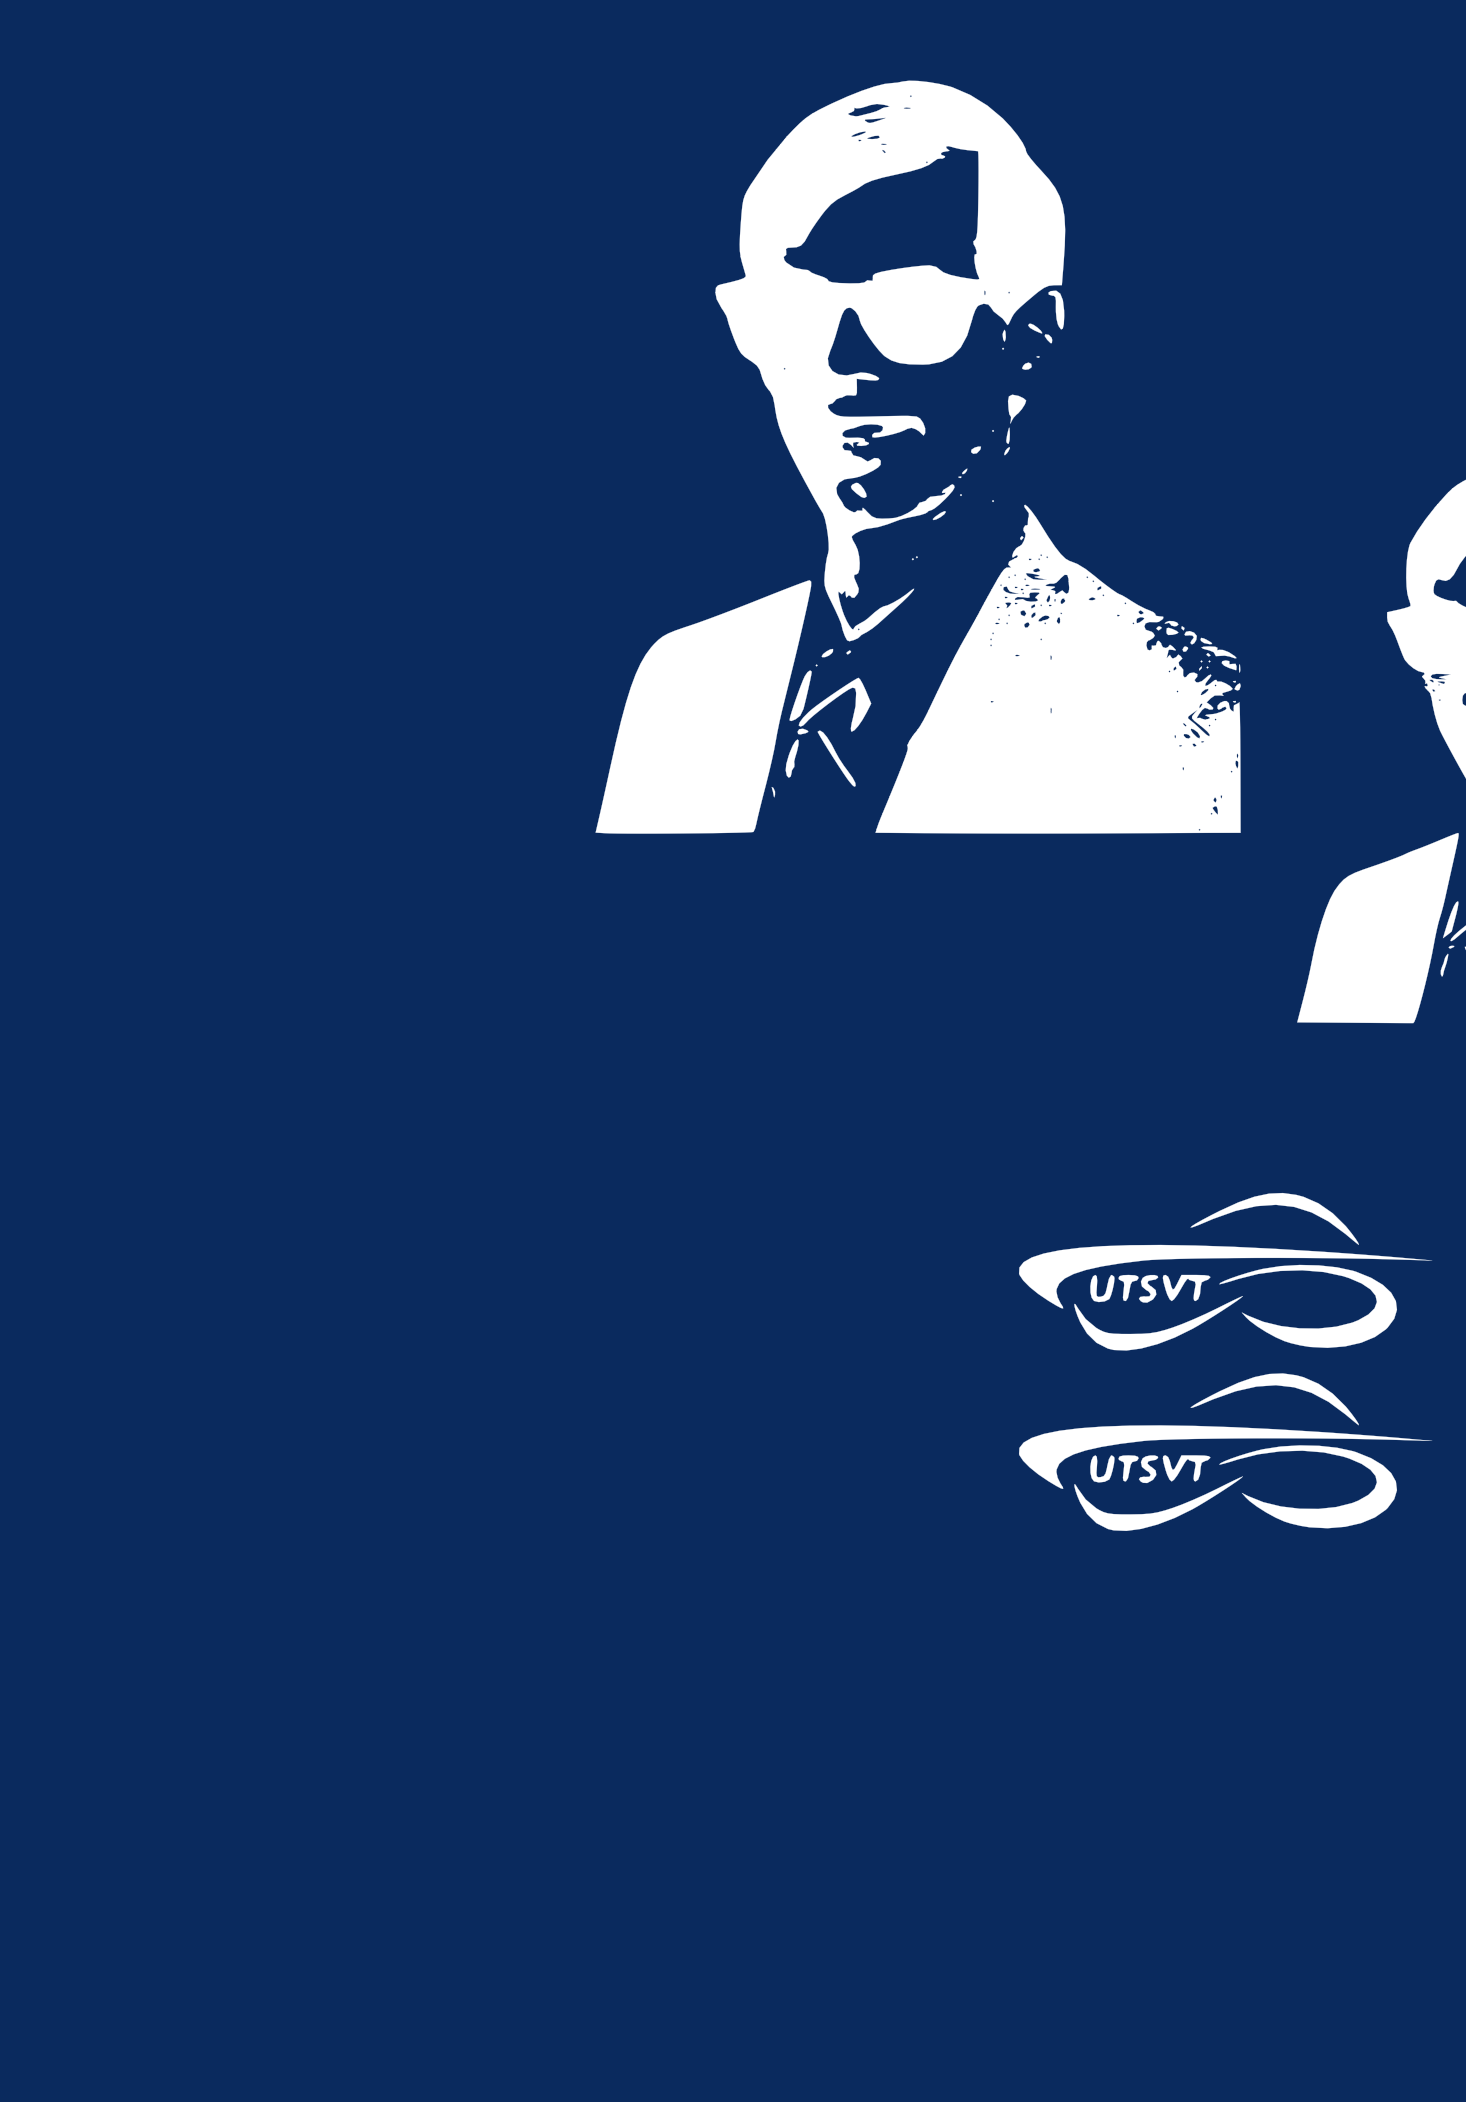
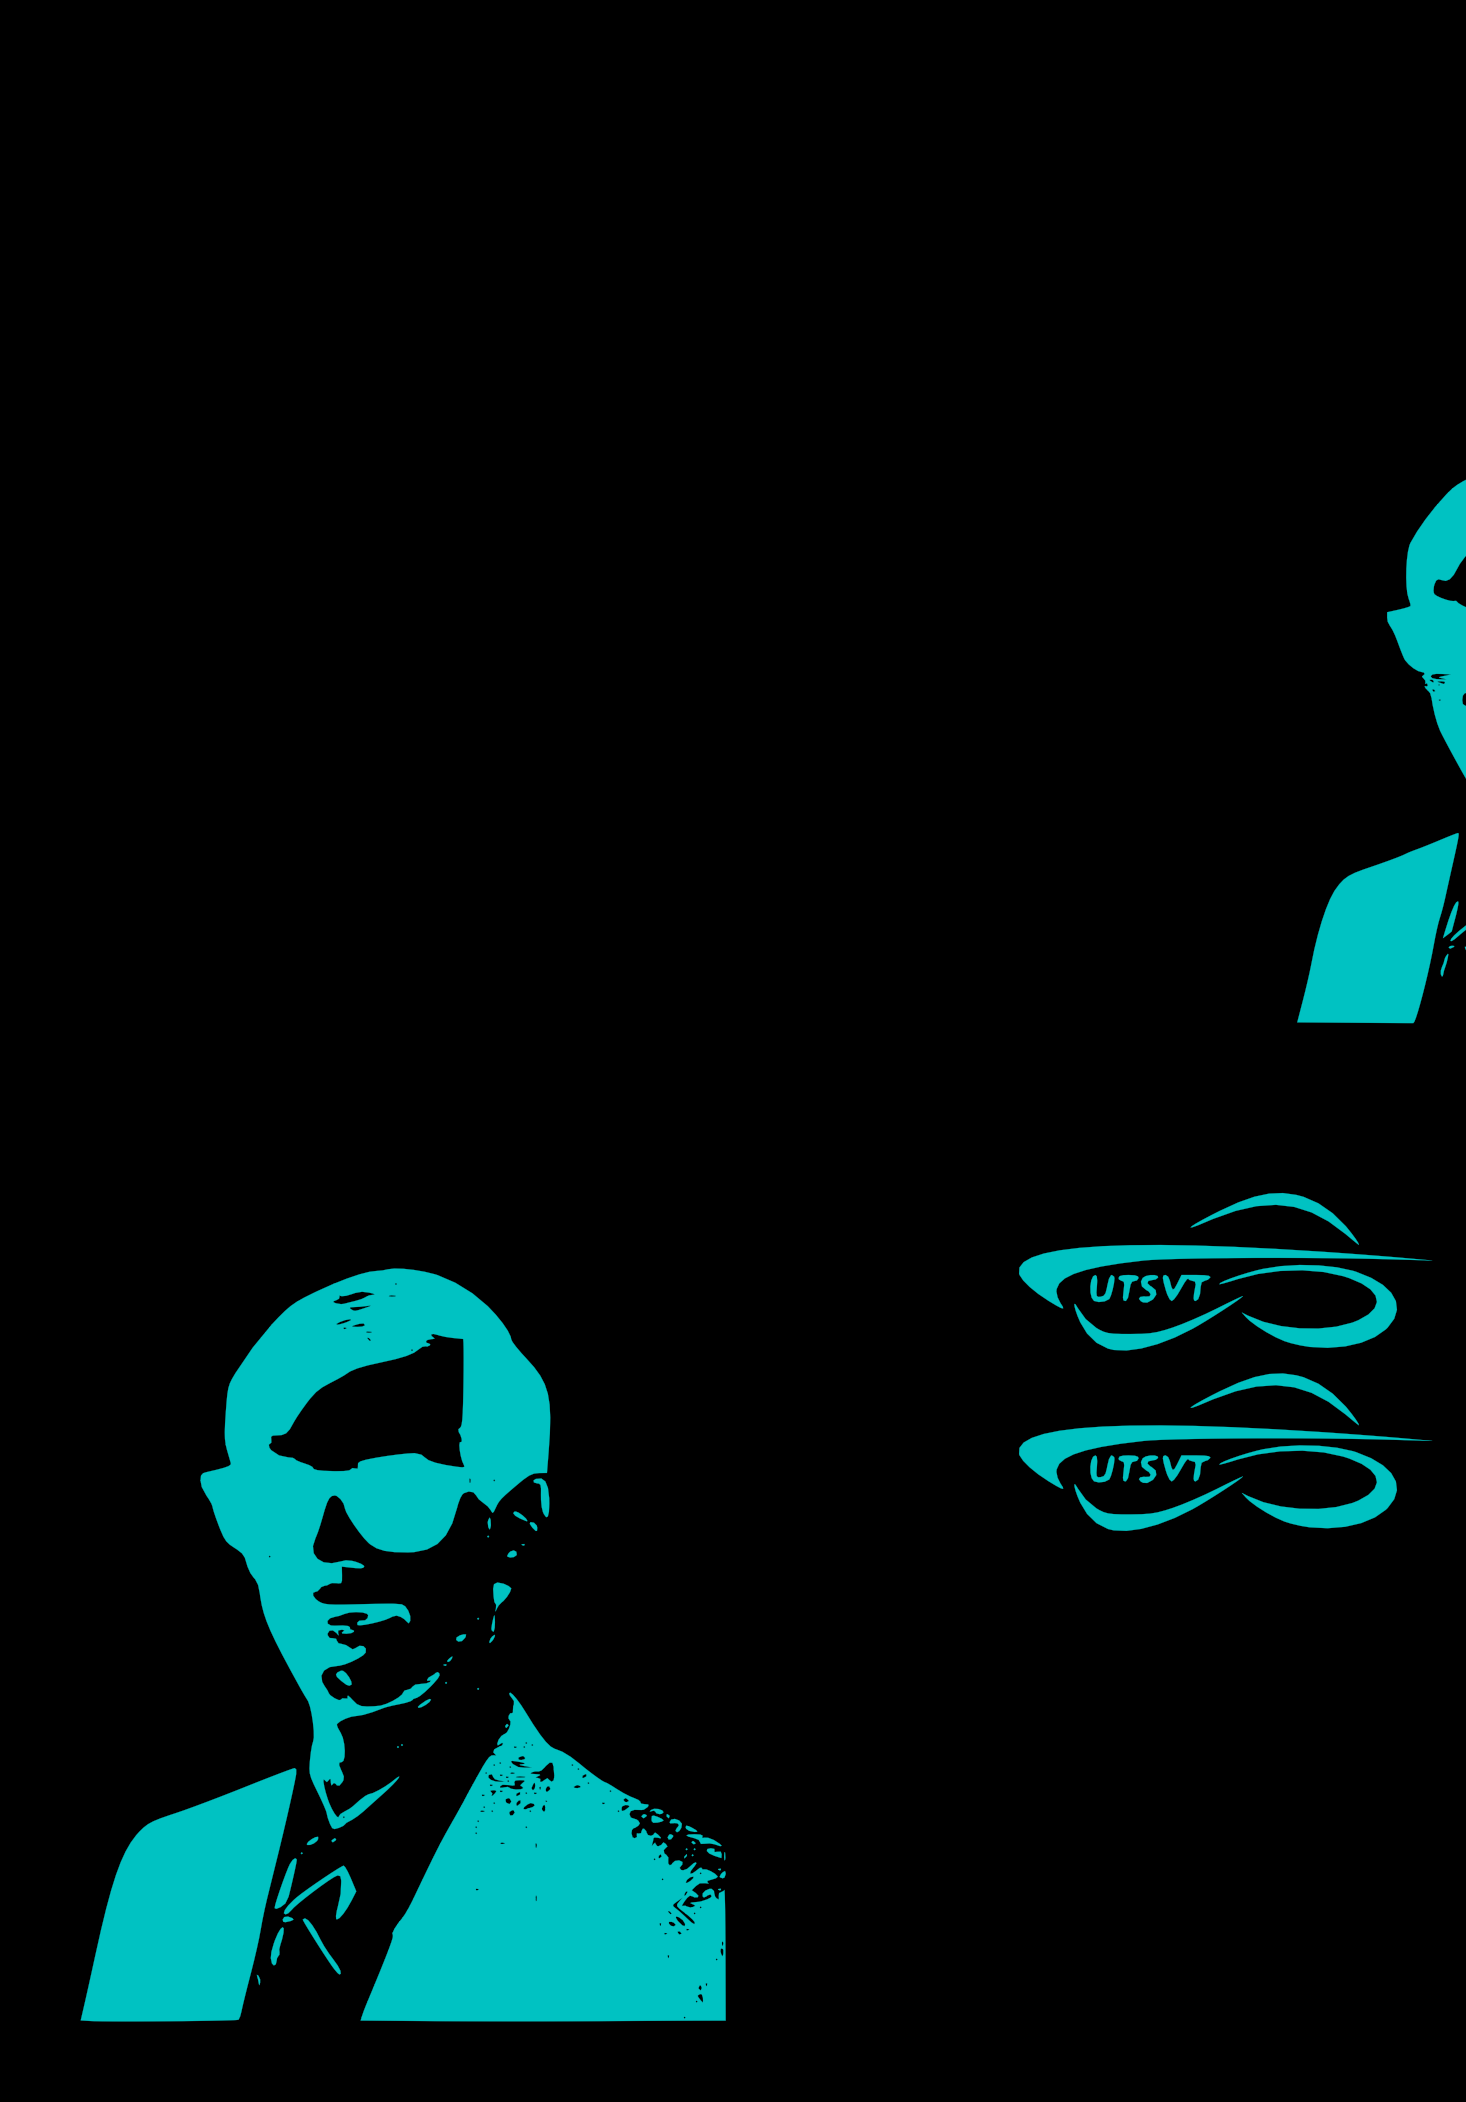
drawing: [595, 80, 1241, 834] -> none
drawing: none -> [80, 1268, 726, 2022]

